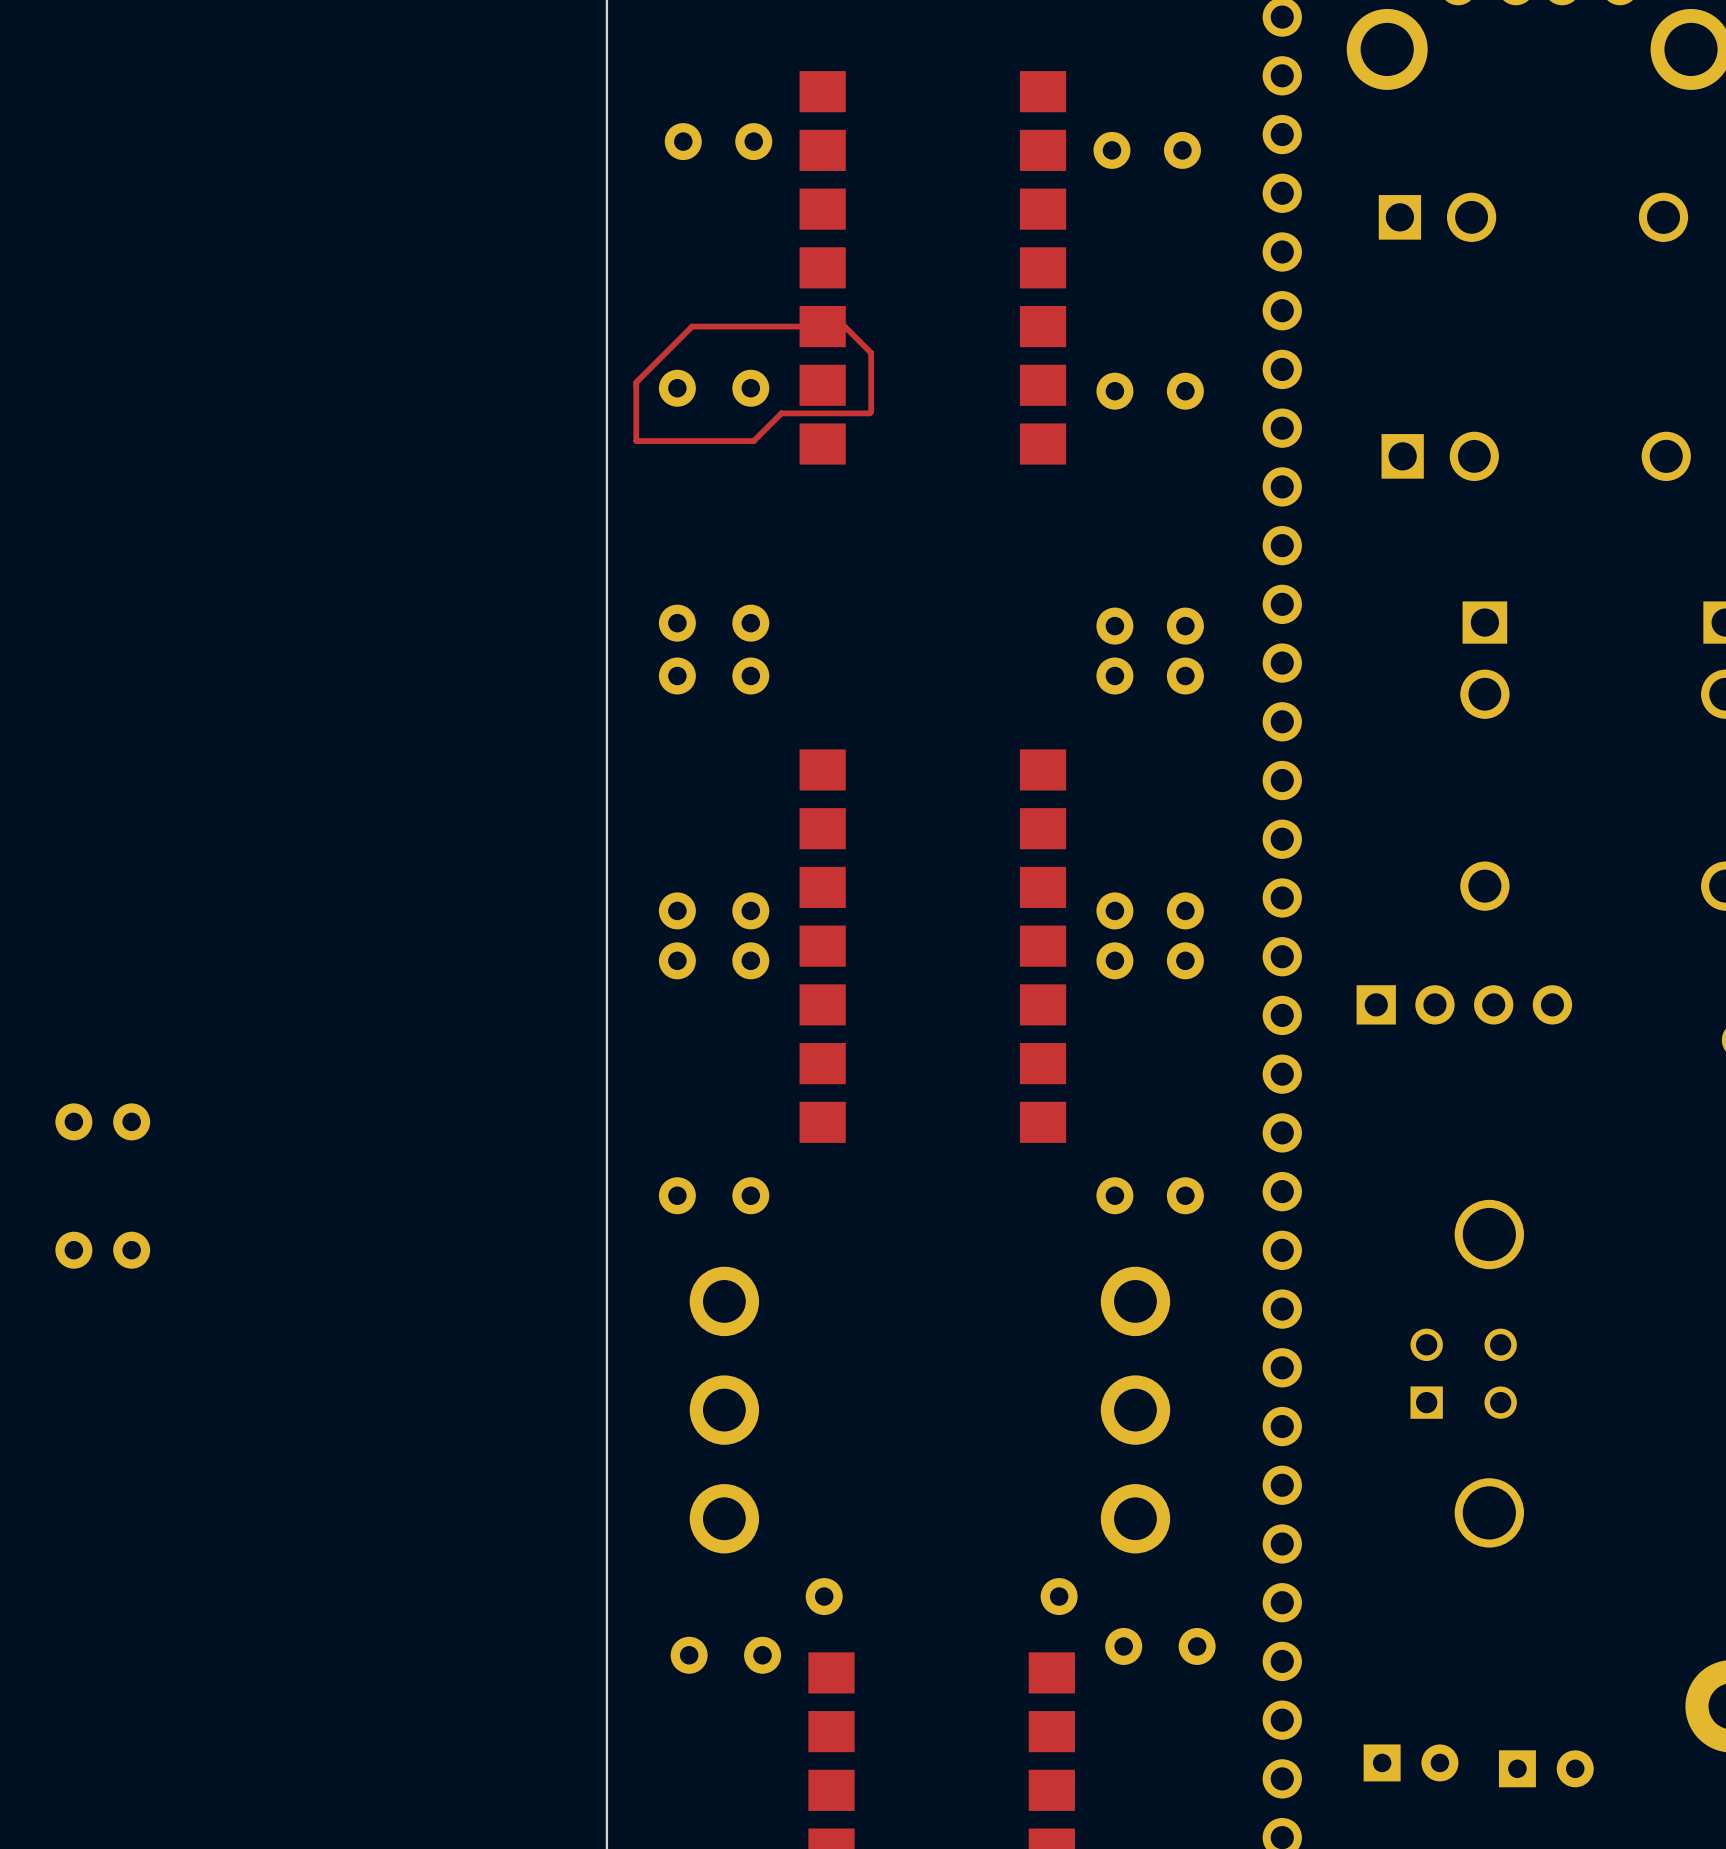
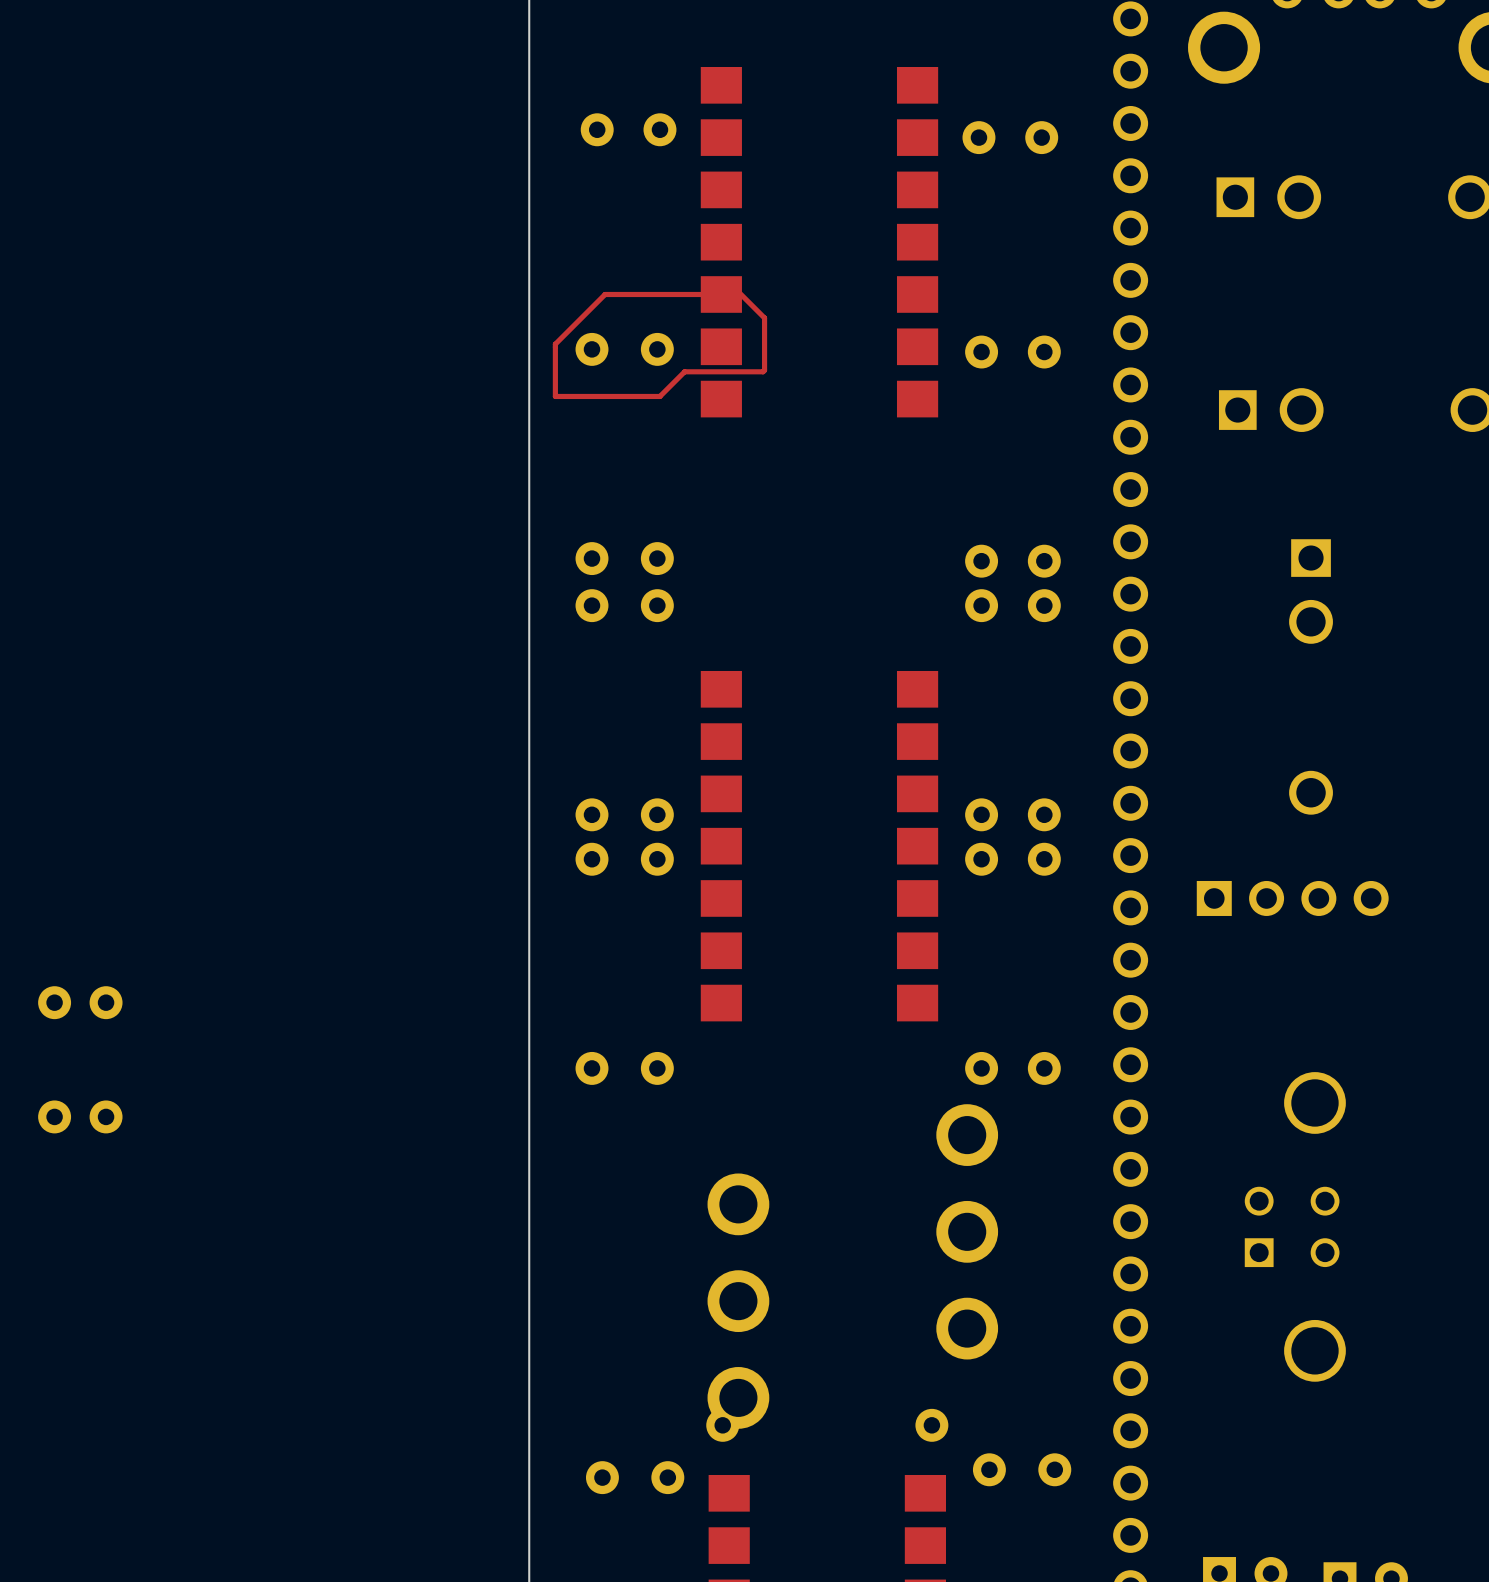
part position: (724, 1410) -> (738, 1301)
part position: (1135, 1410) -> (967, 1231)

